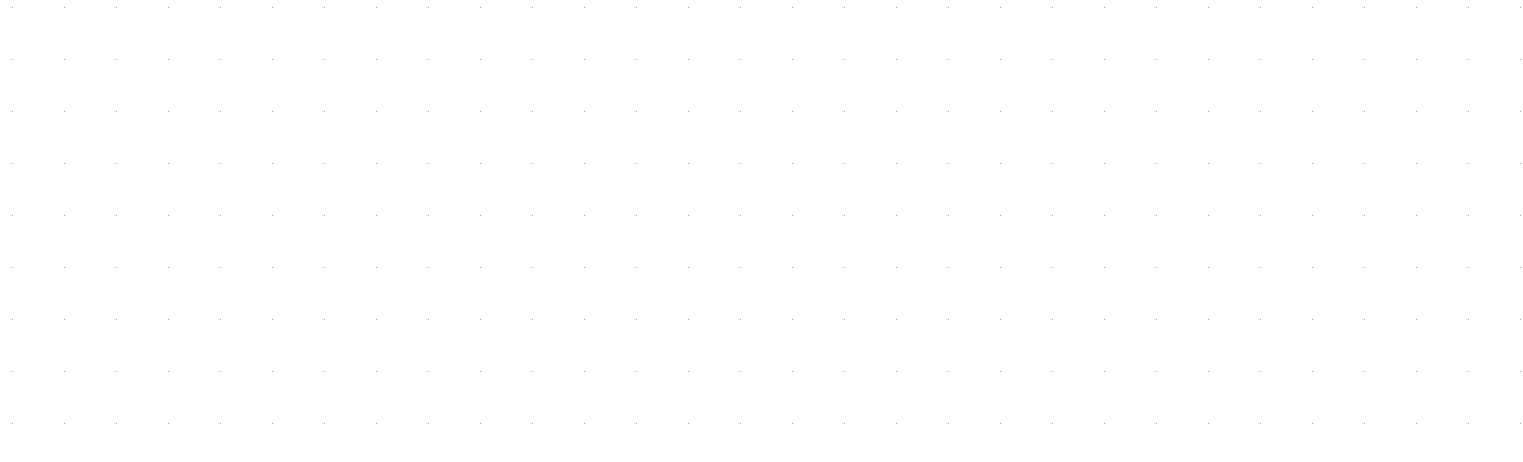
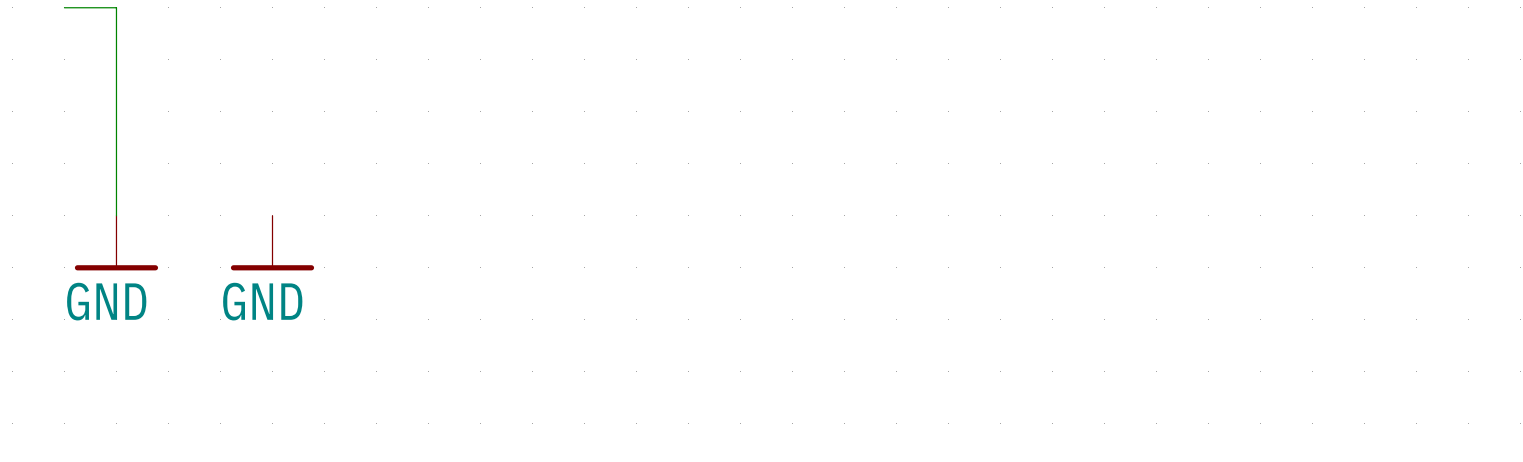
wire: none -> (64, 7) (116, 7) (116, 215)
power symbol: none -> GND (116, 243)
power symbol: none -> GND (272, 243)

